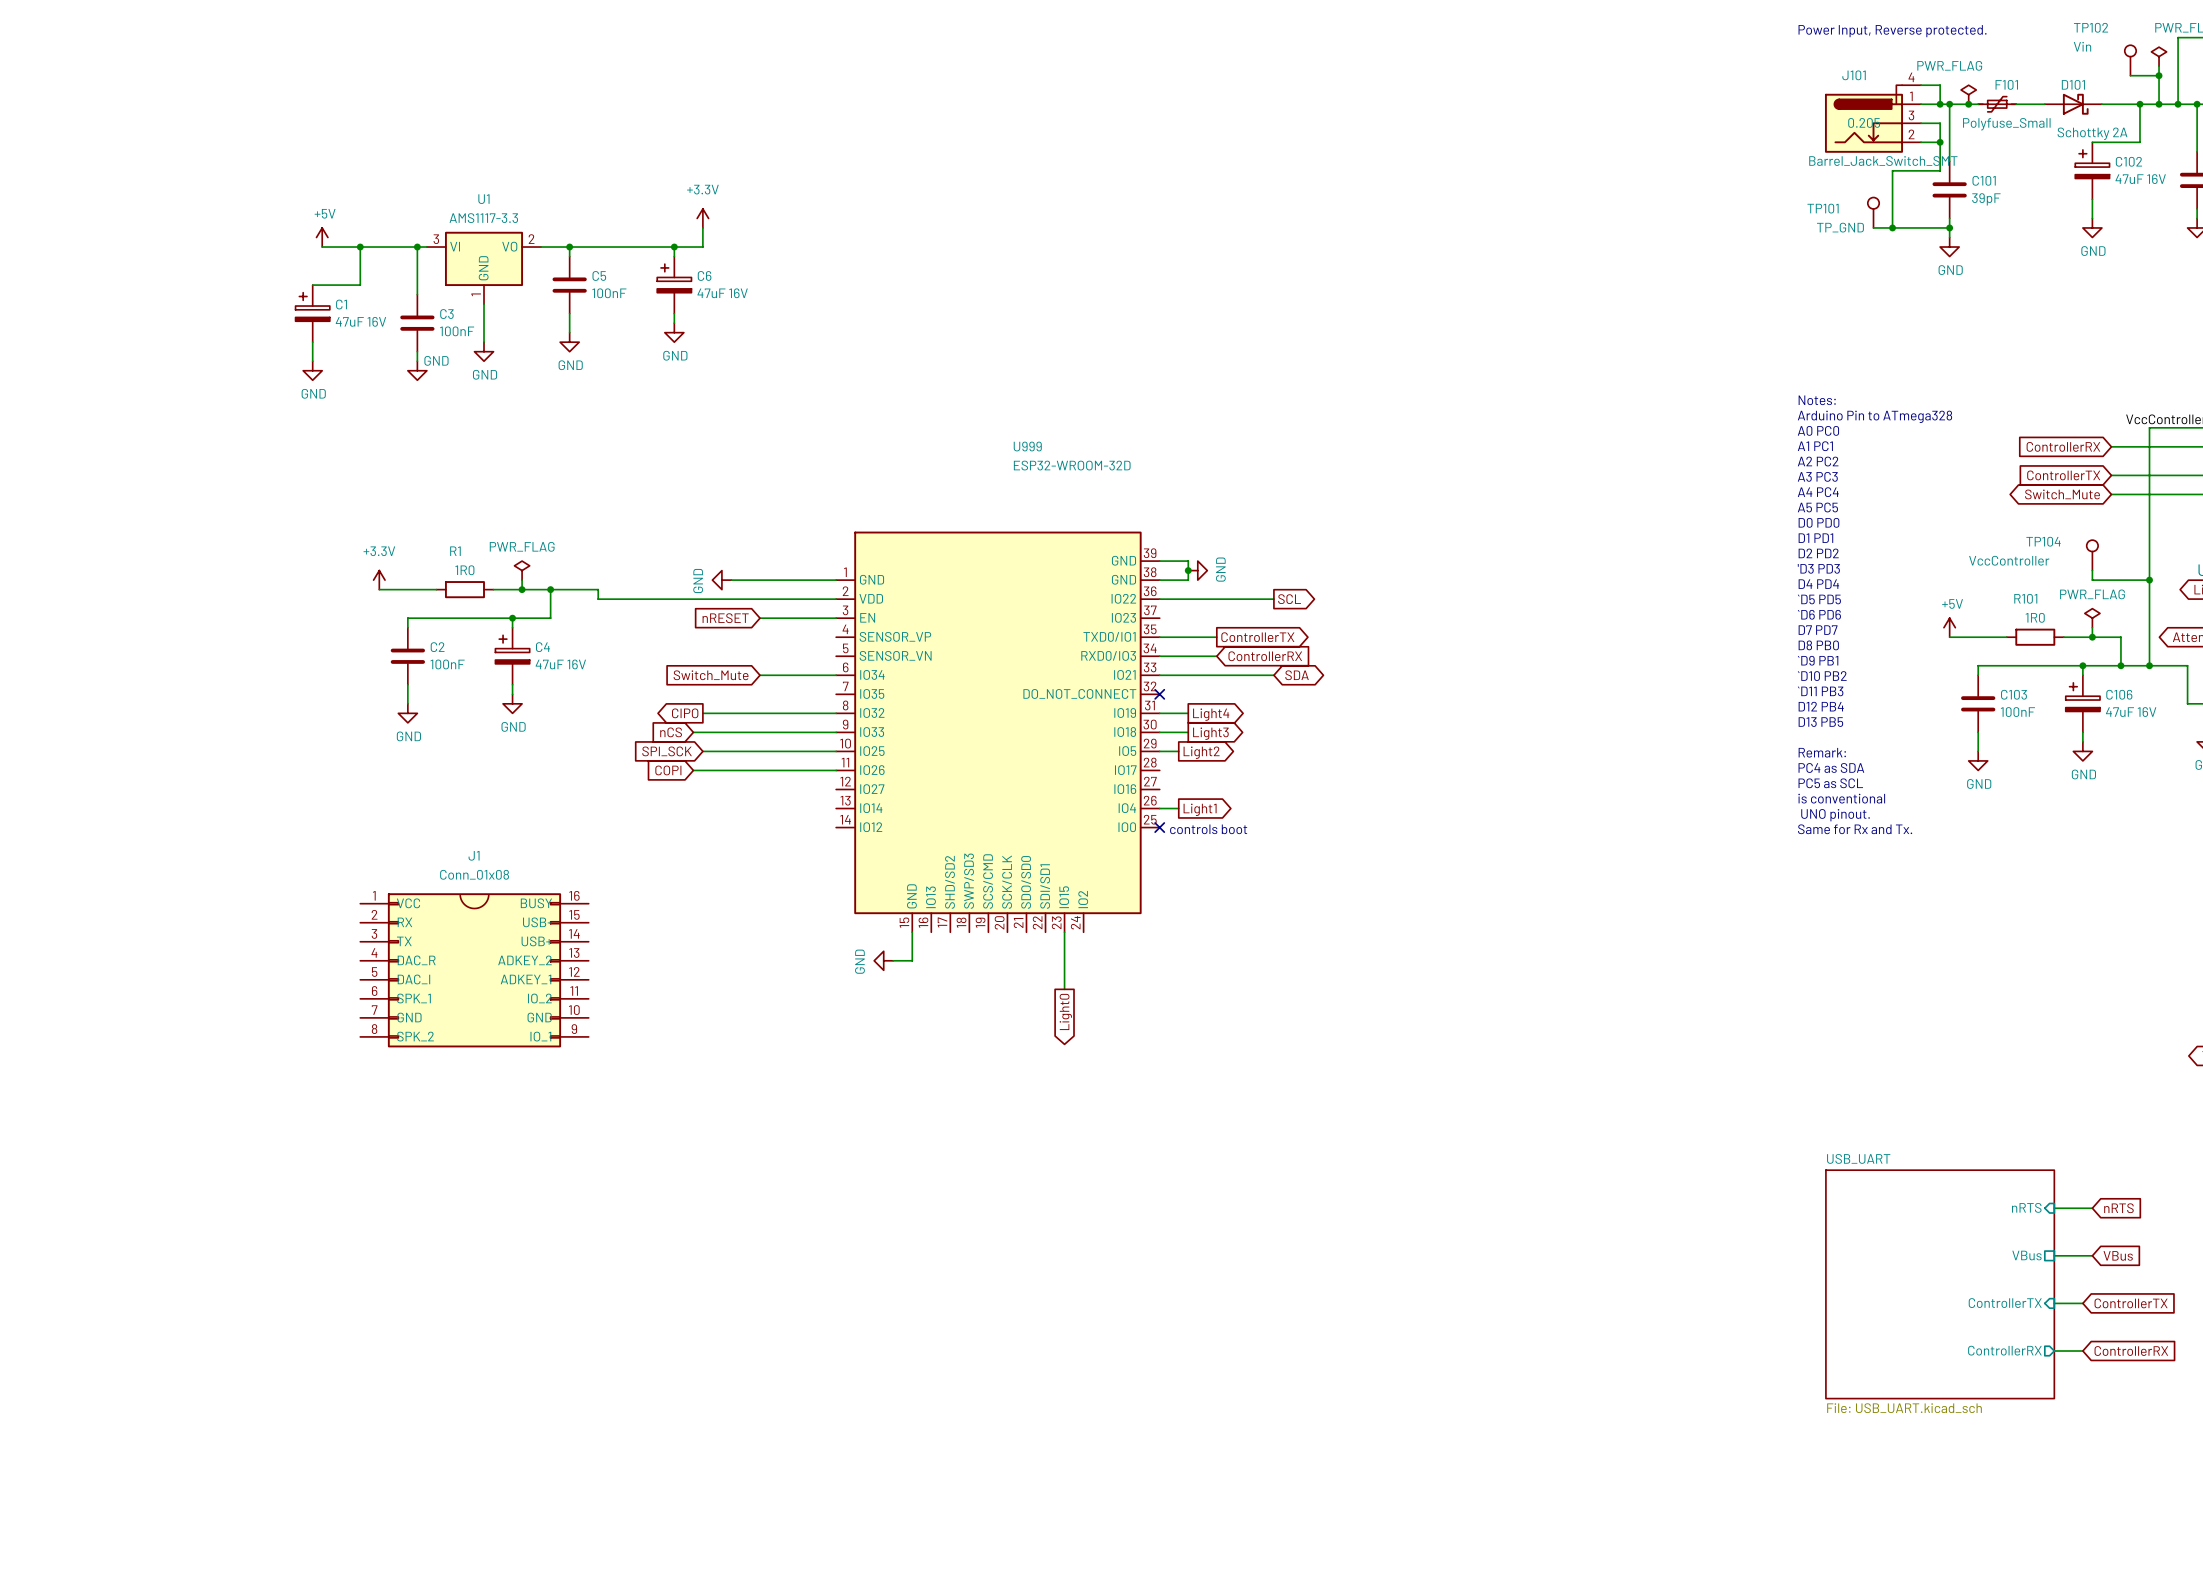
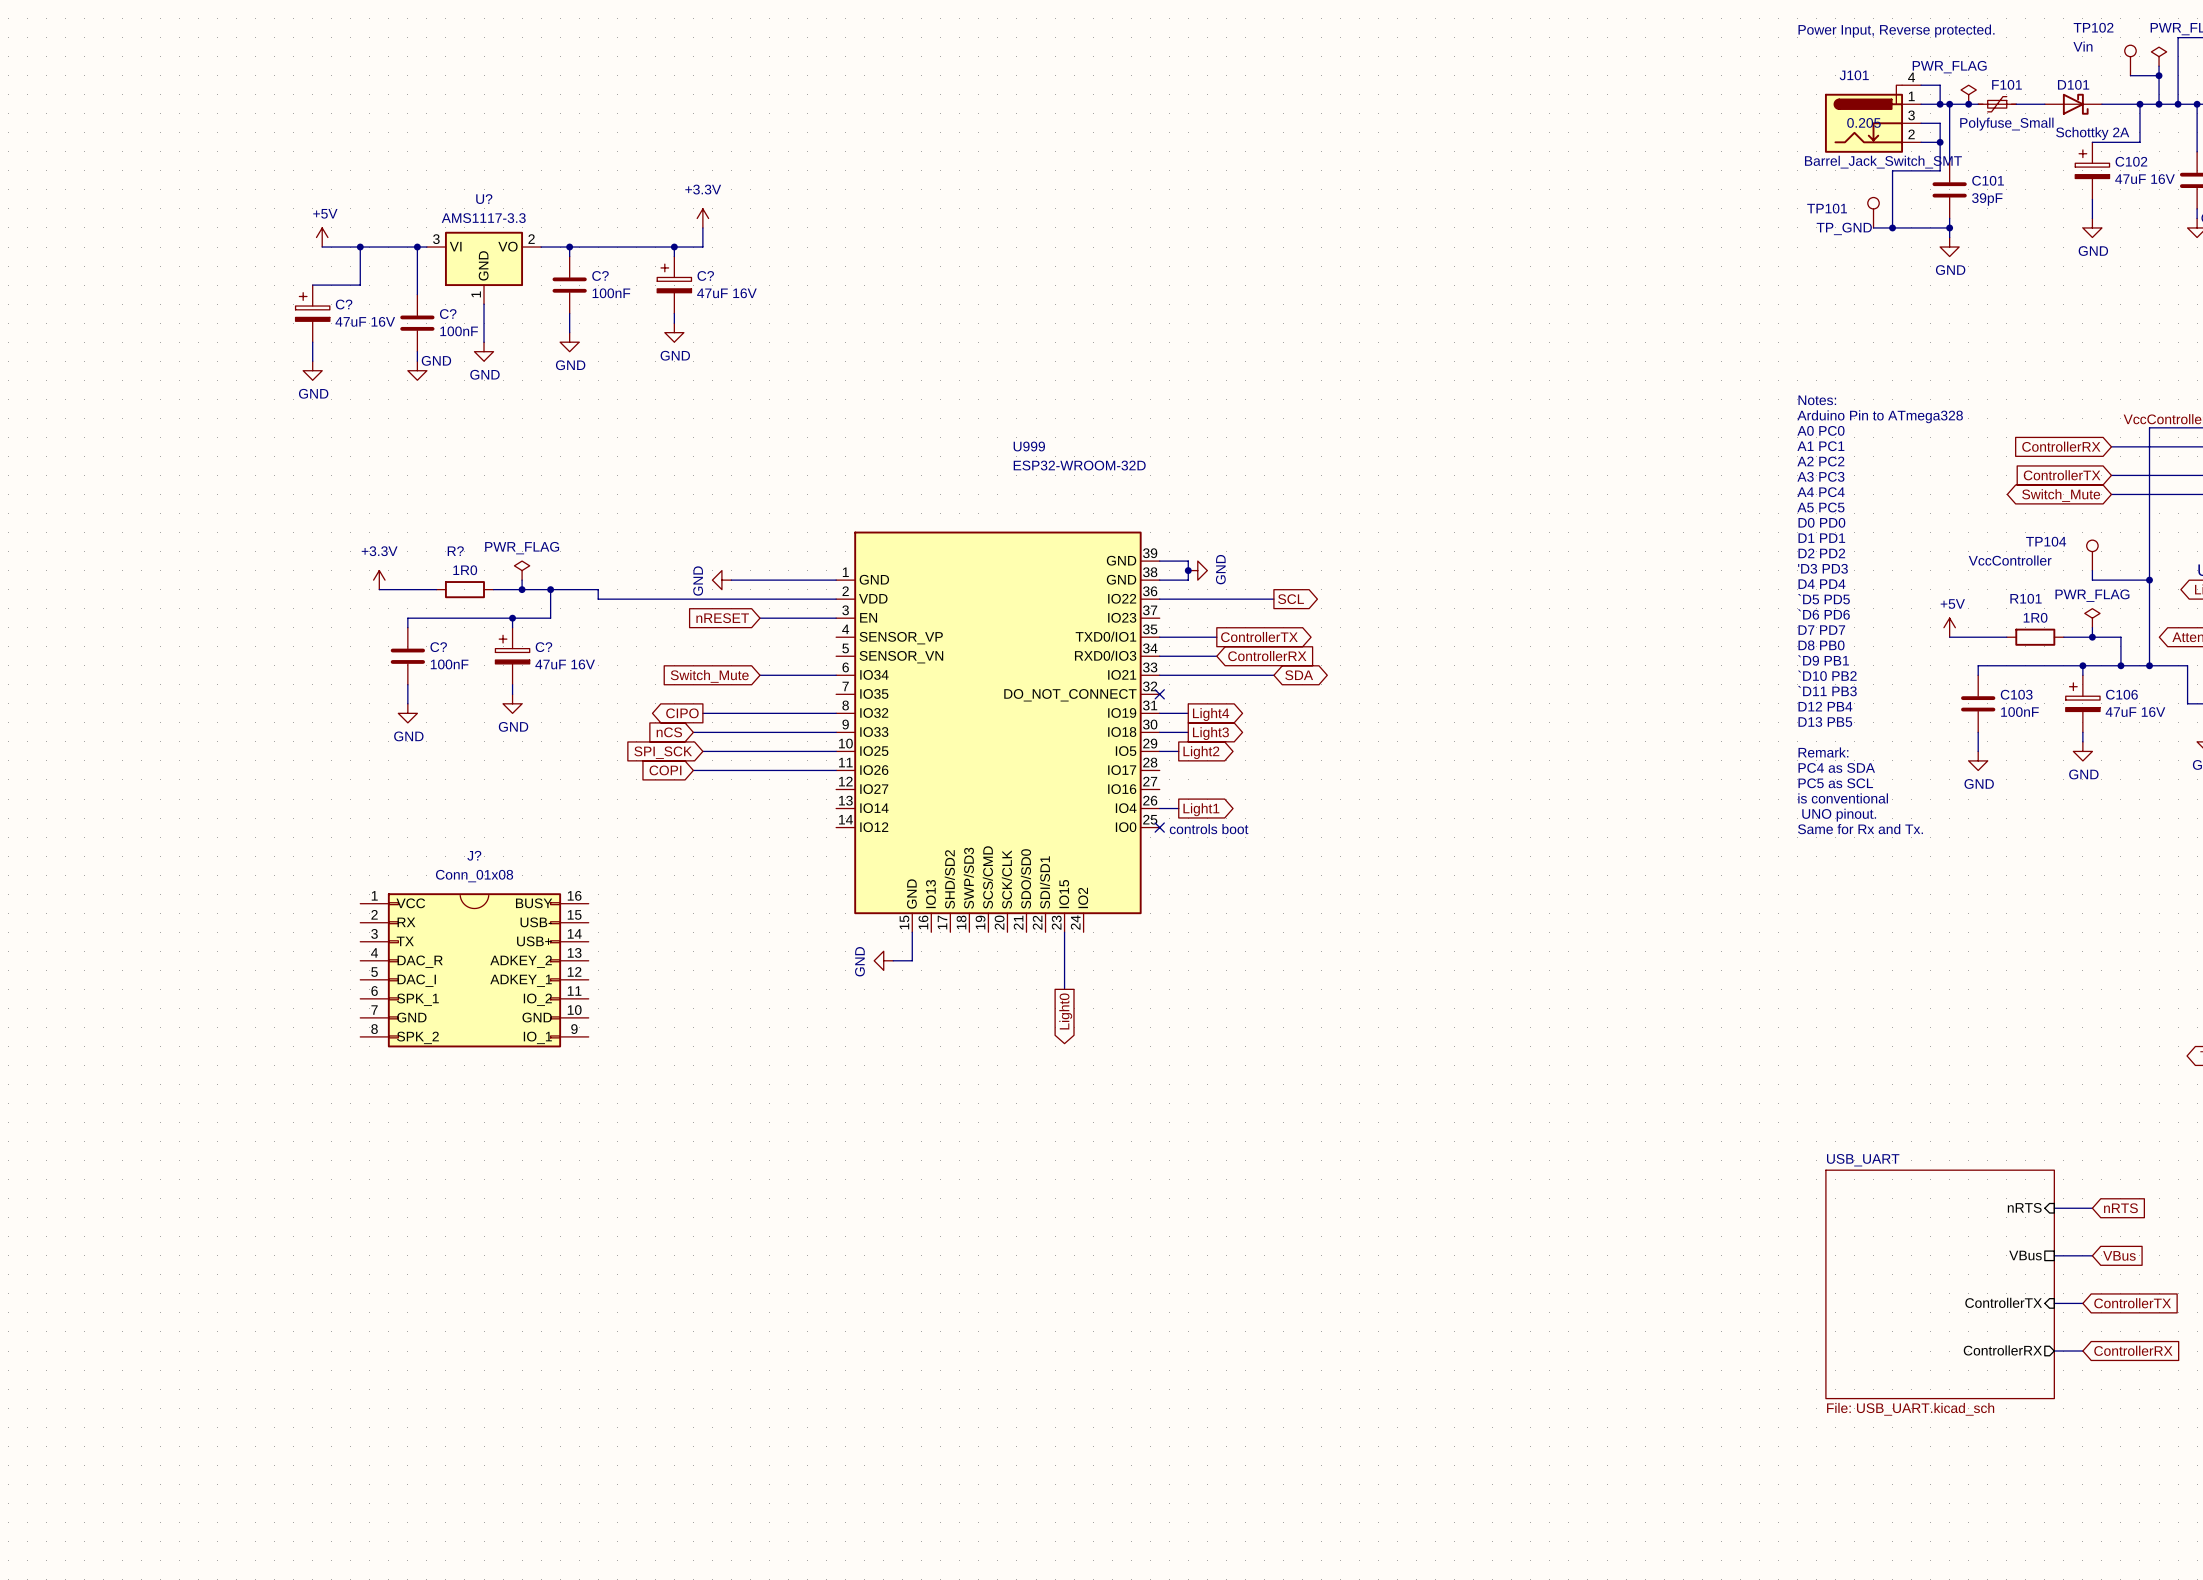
U1 name: U1 (483, 199) -> U? (484, 199)
C5 name: C5 (599, 275) -> C? (600, 275)
C6 name: C6 (704, 275) -> C? (705, 275)
C1 name: C1 (341, 304) -> C? (344, 304)
C3 name: C3 (446, 314) -> C? (448, 314)
R1 name: R1 (455, 551) -> R? (455, 551)
C2 name: C2 (437, 647) -> C? (438, 647)
C4 name: C4 (542, 647) -> C? (543, 647)
J1 name: J1 (474, 855) -> J? (474, 855)

